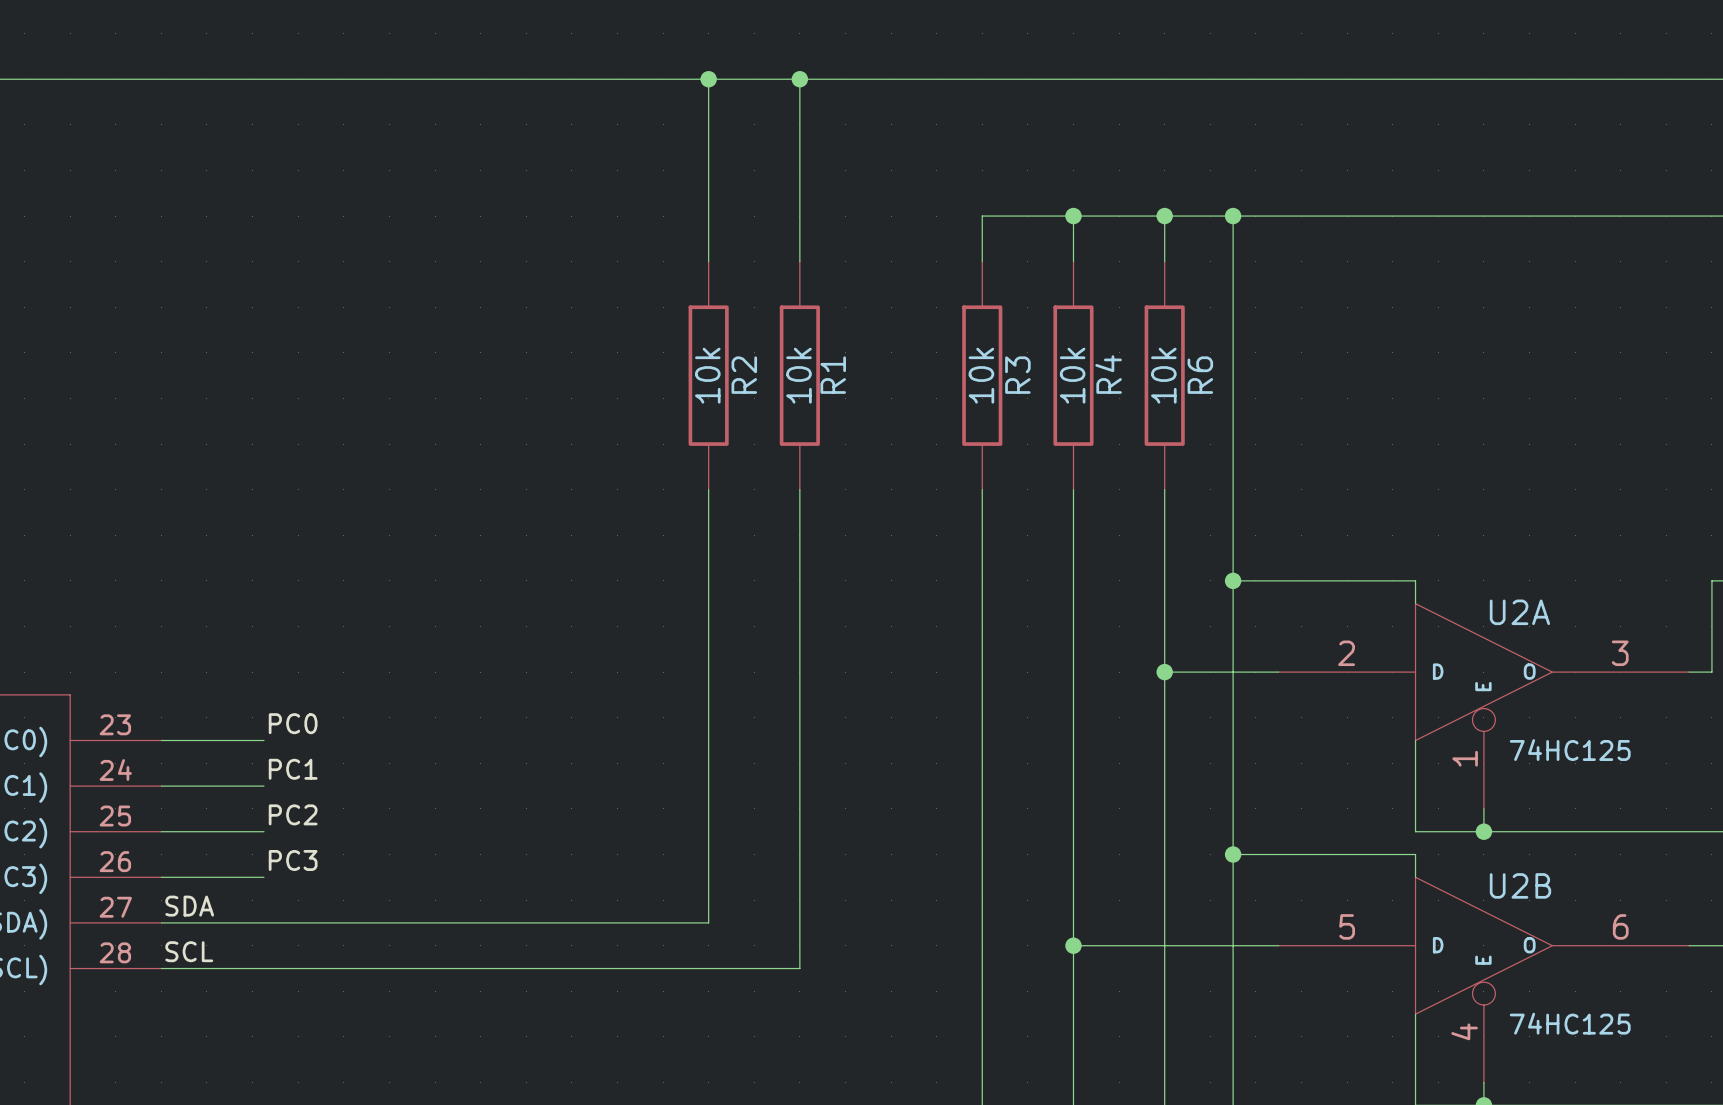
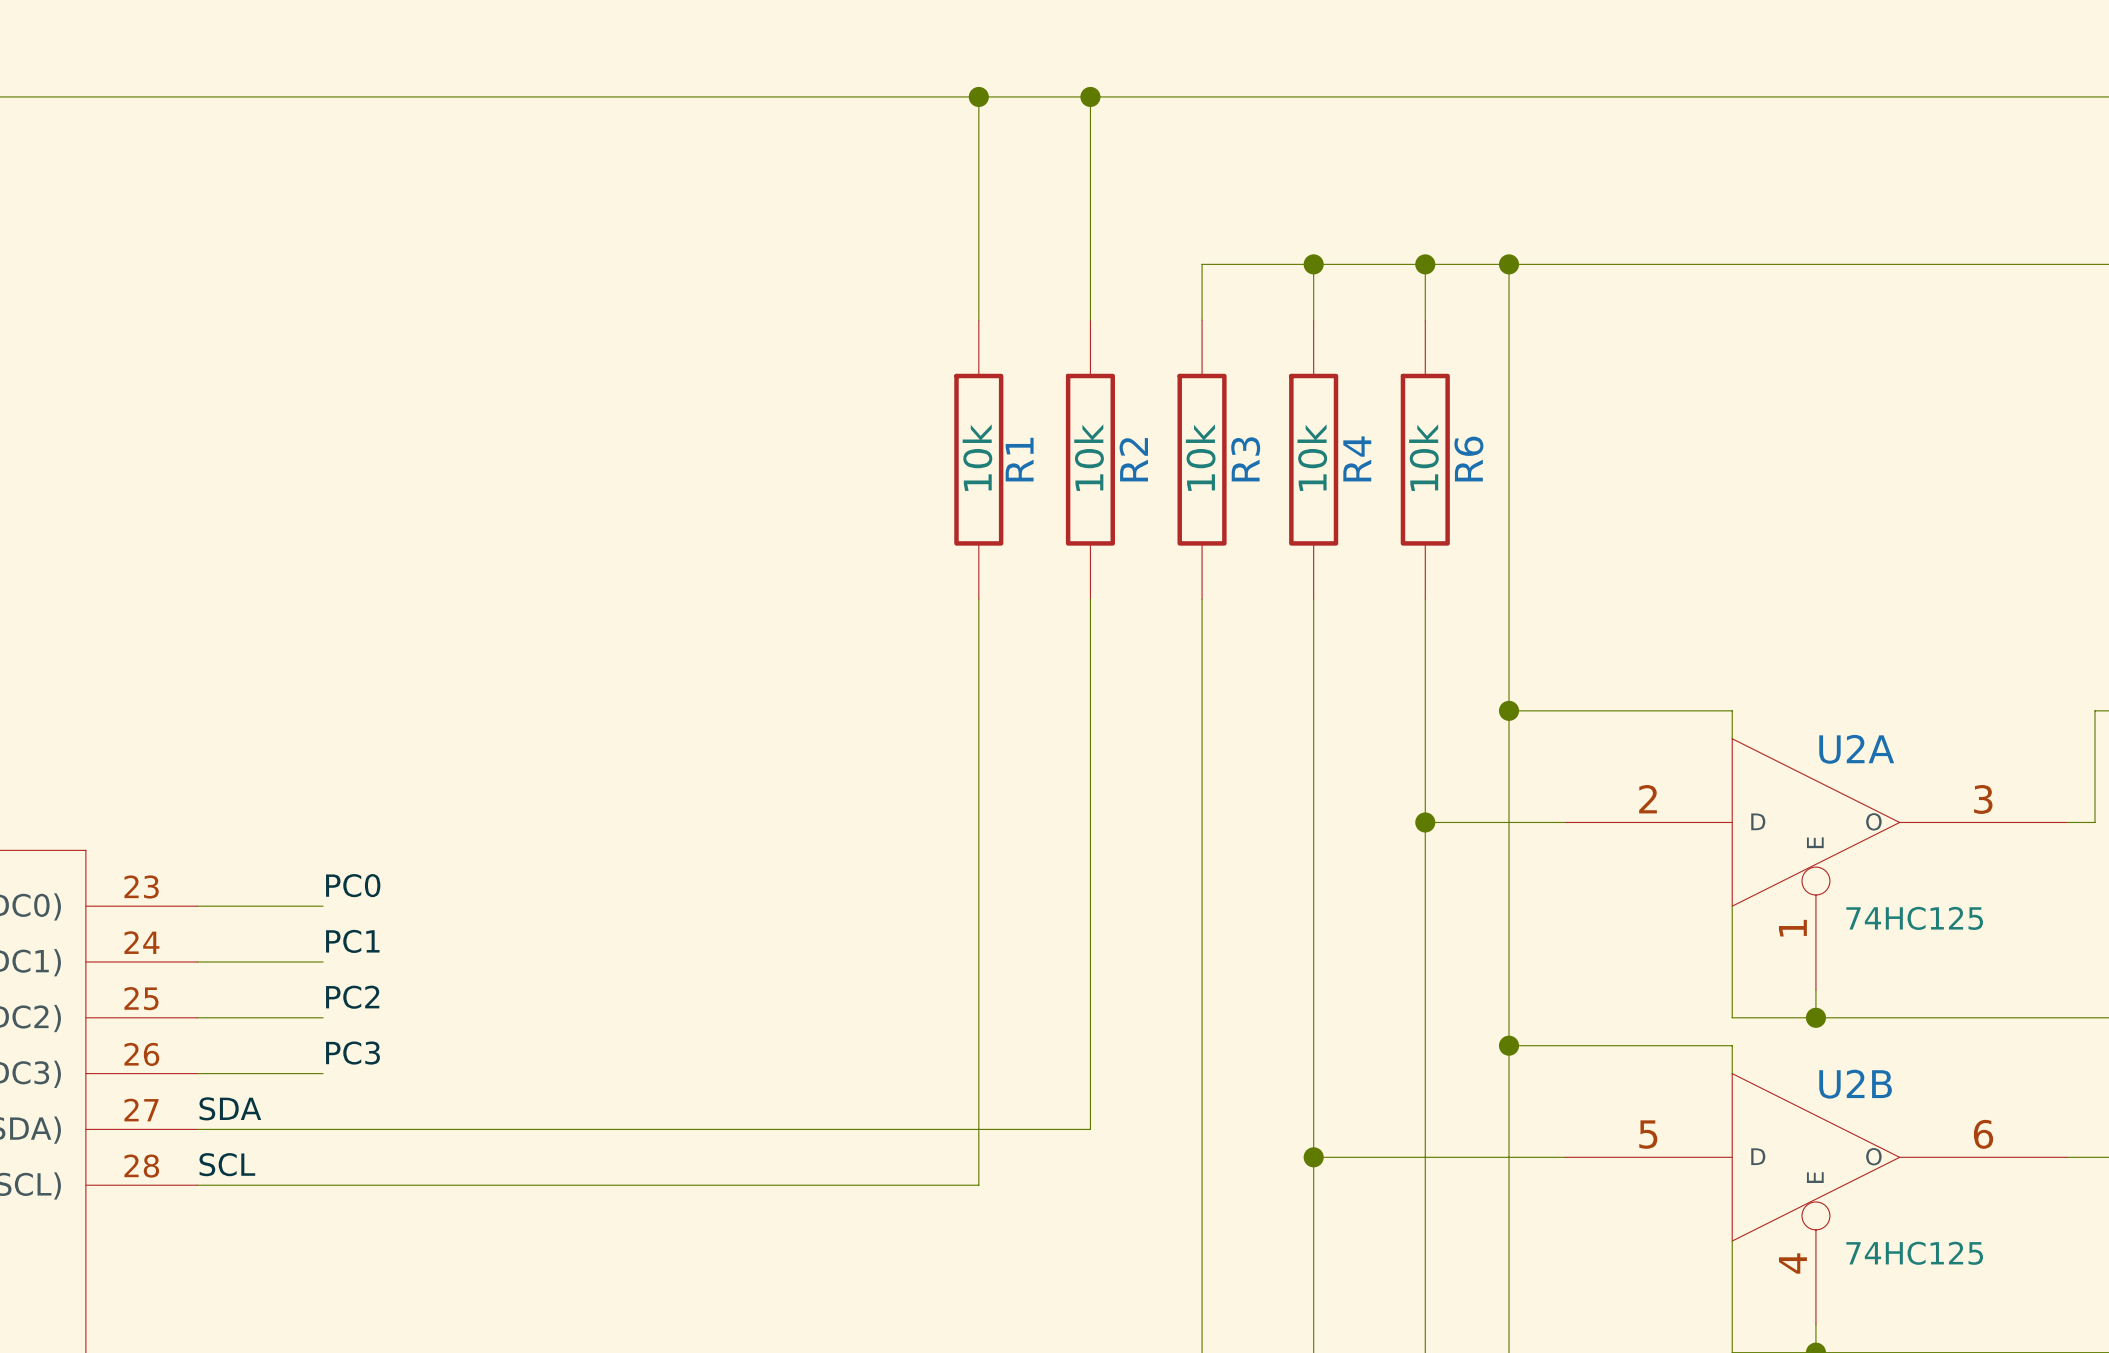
wire: (708, 79) (708, 261) -> (1090, 96) (1090, 320)
junction: (708, 79) -> none
junction: none -> (1090, 96)
R2 position: (708, 375) -> (1090, 459)
wire: (708, 489) (708, 922) -> (1090, 599) (1090, 1129) (867, 1129)

